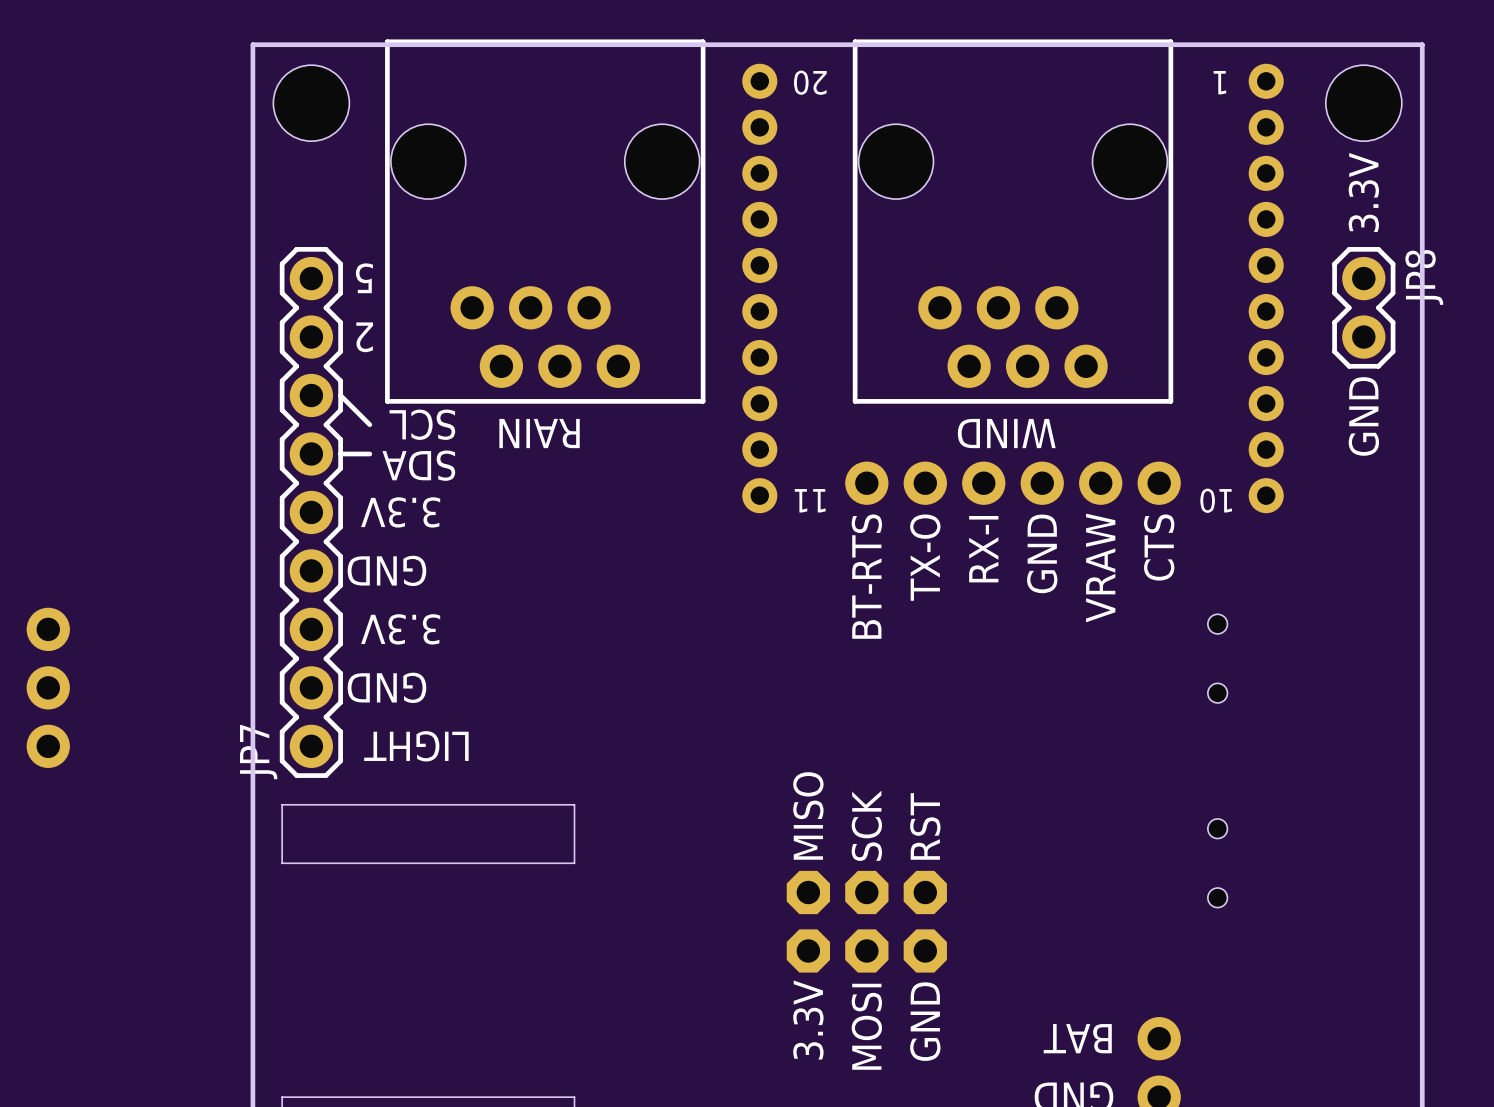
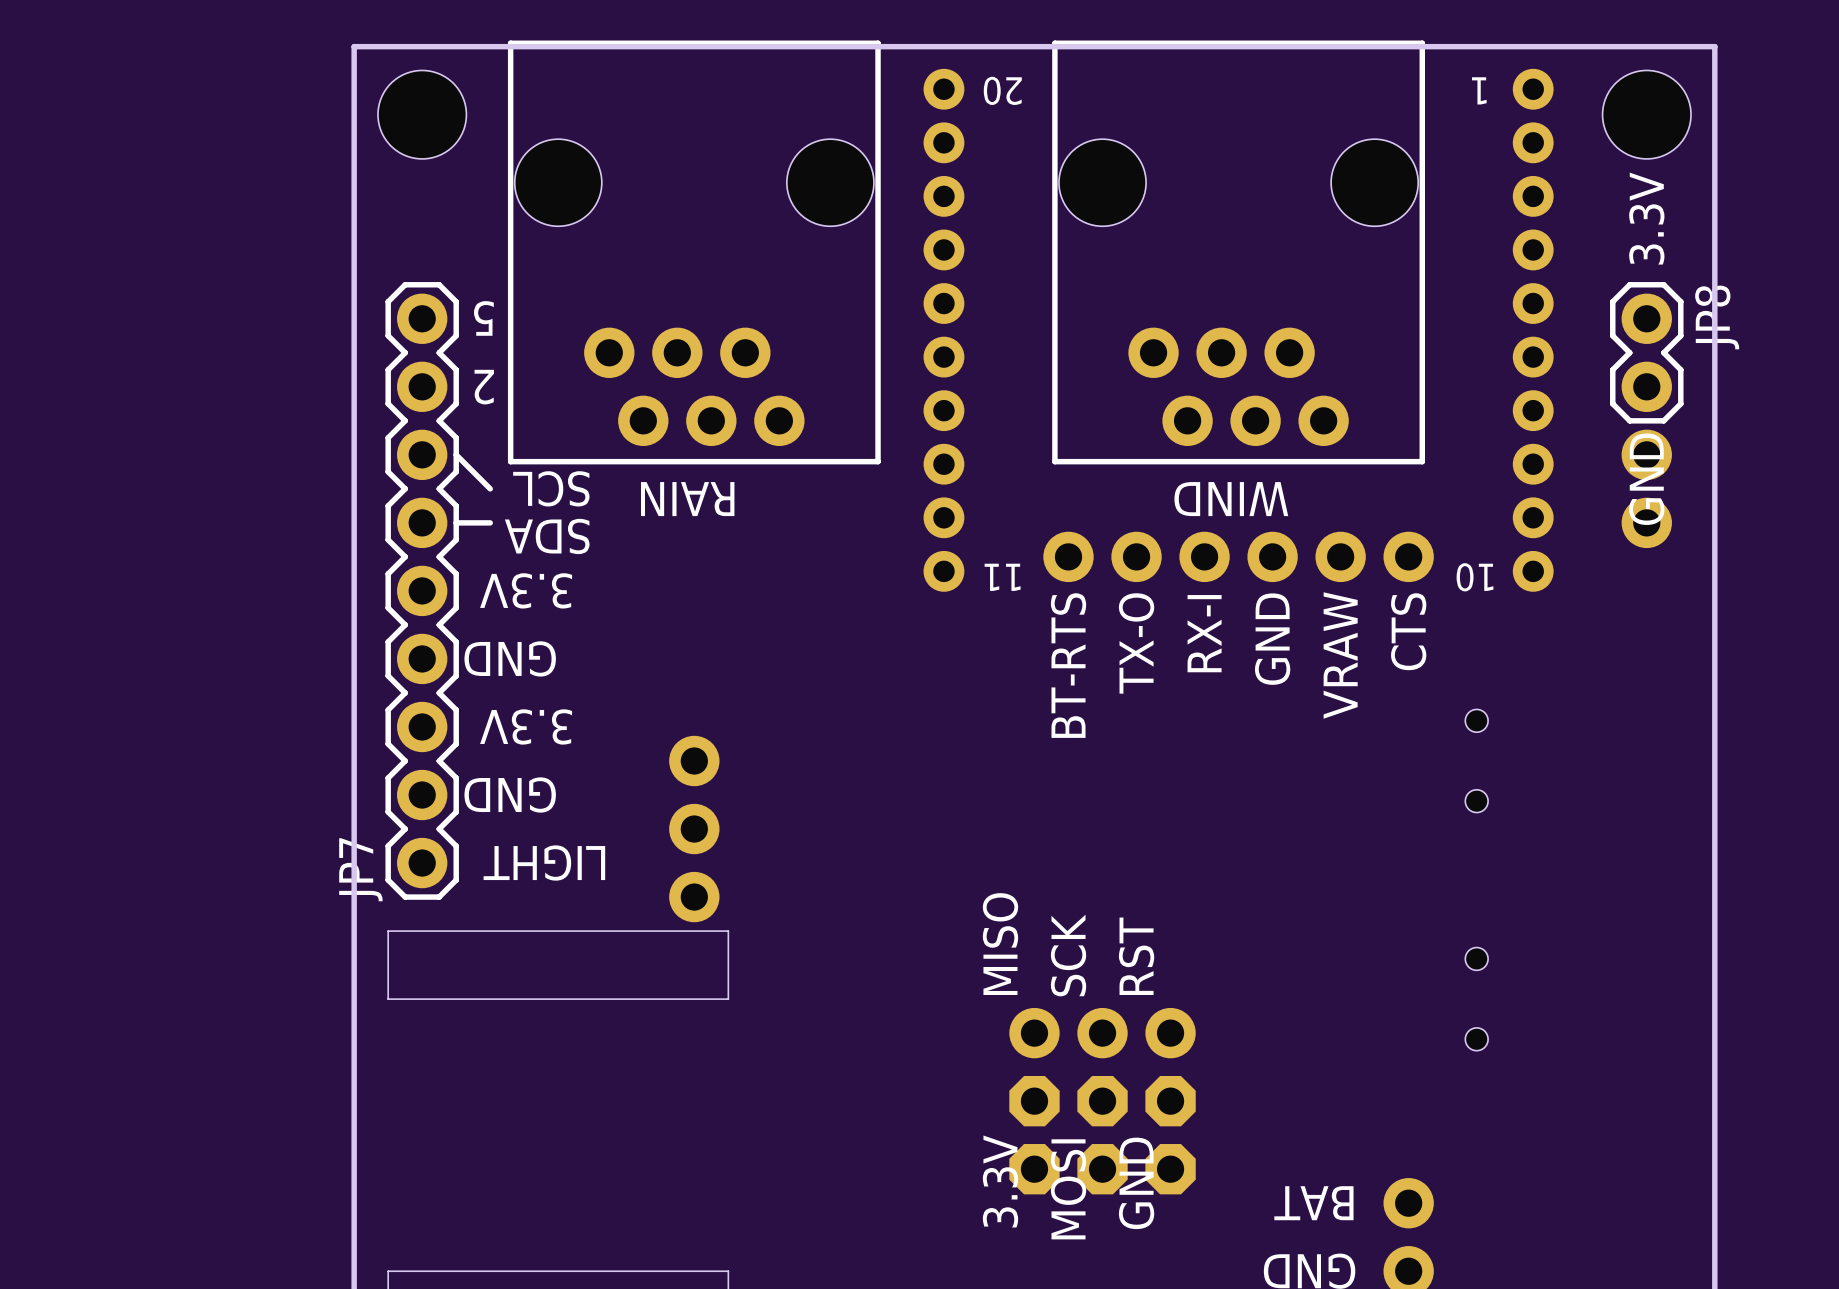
part: none -> (1646, 488)
part: (48, 687) -> none
part: none -> (694, 829)
part: none -> (1102, 1033)
part position: (866, 921) -> (1102, 1135)

